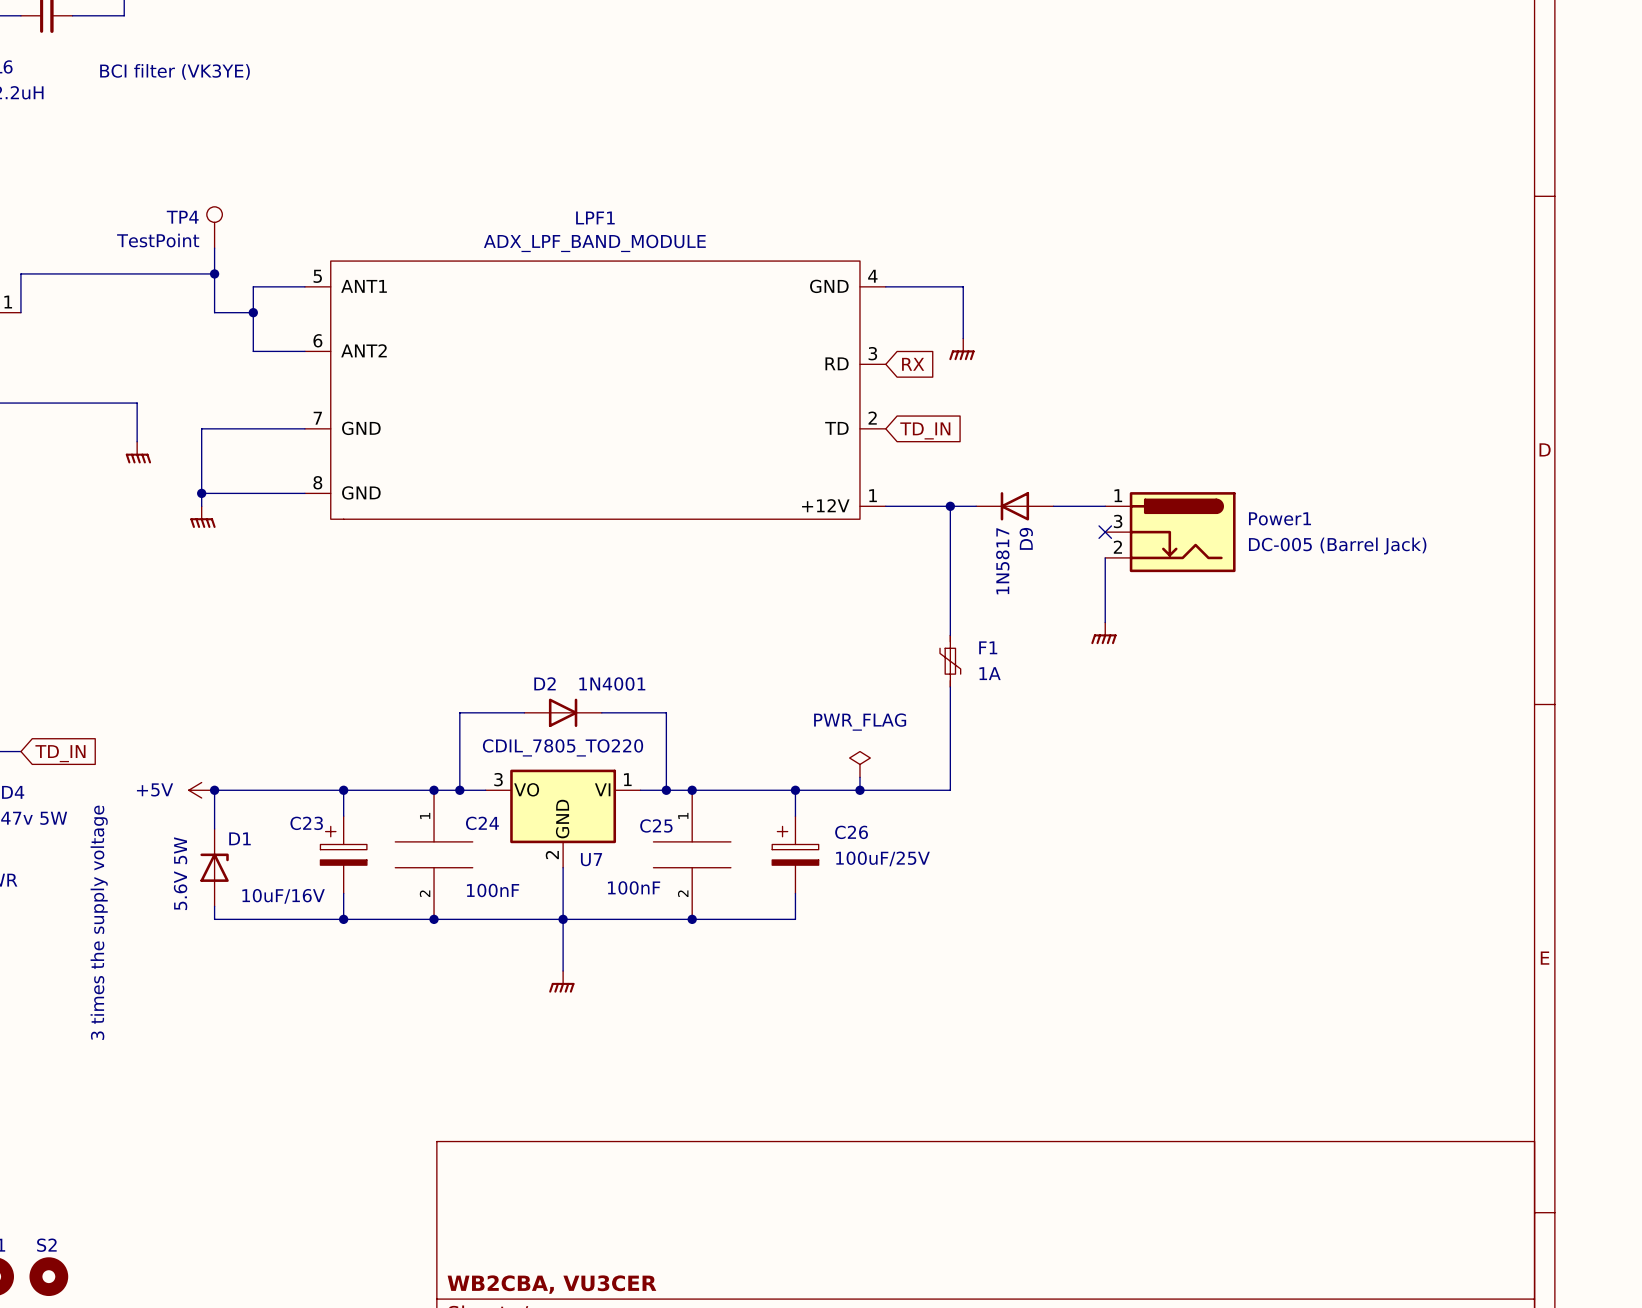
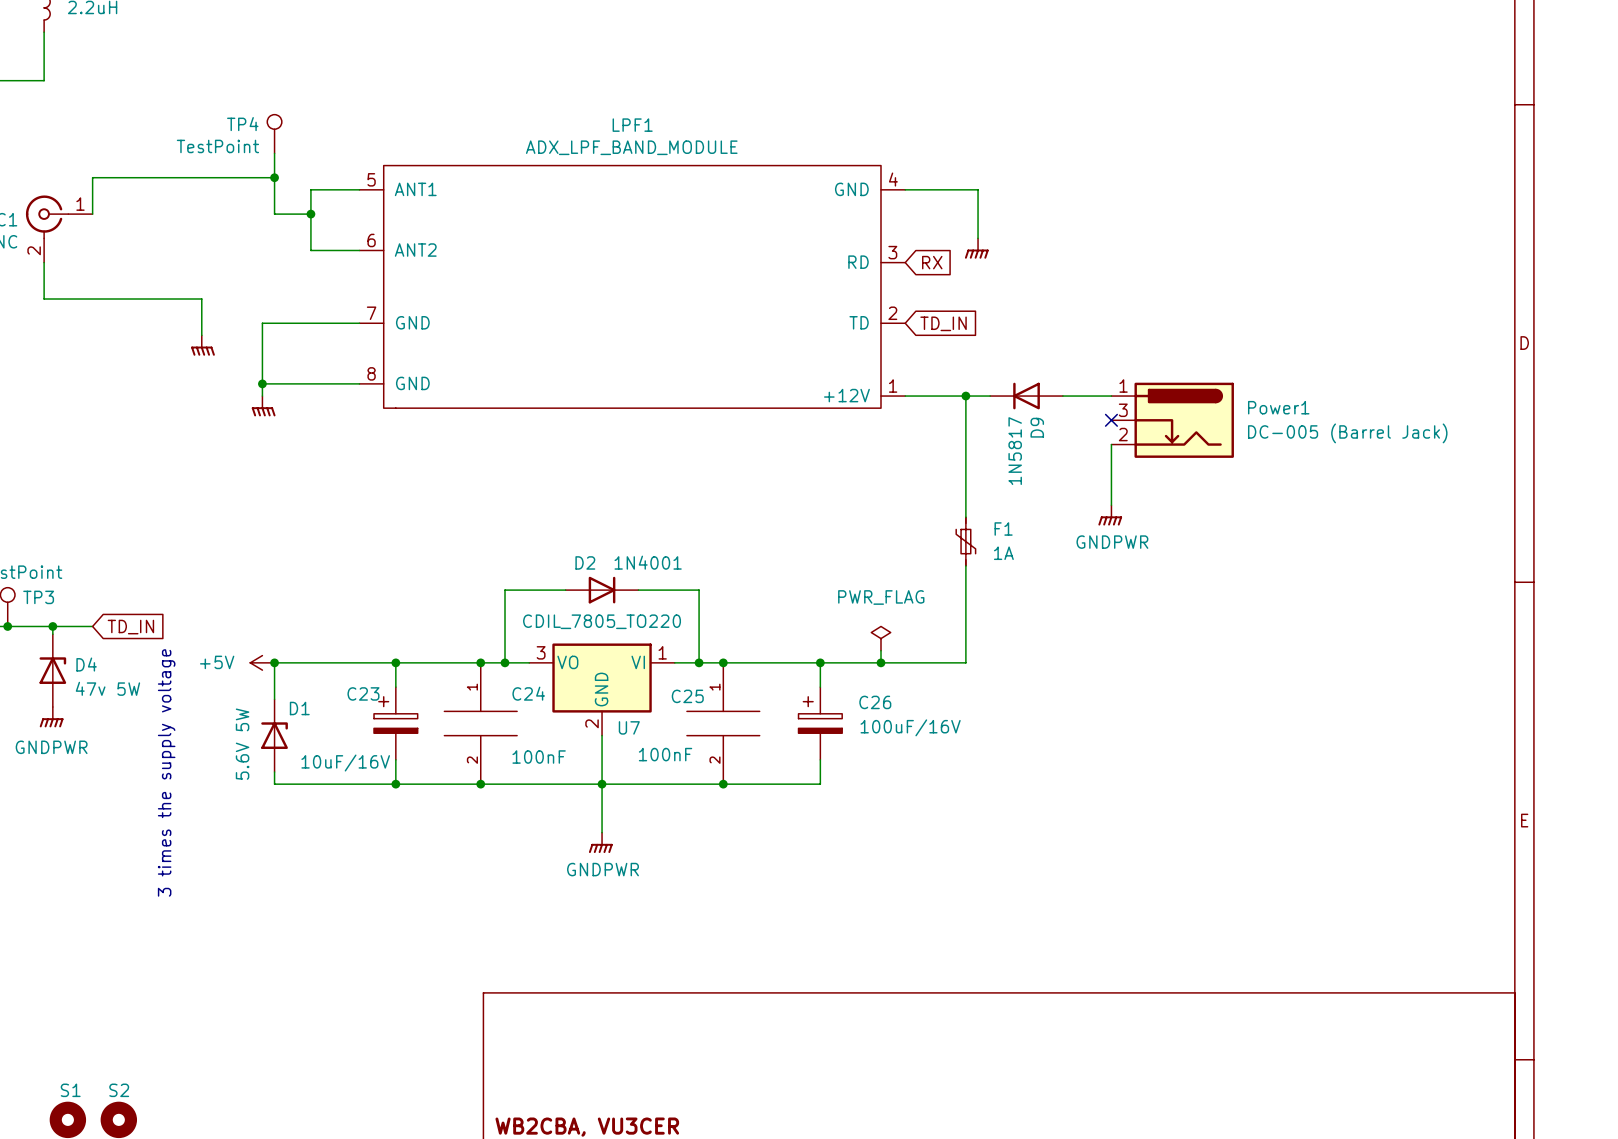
power symbol text: none -> GNDPWR (1112, 542)
C26 value: 100uF/25V (882, 858) -> 100uF/16V (910, 727)
power symbol text: none -> GNDPWR (603, 869)

